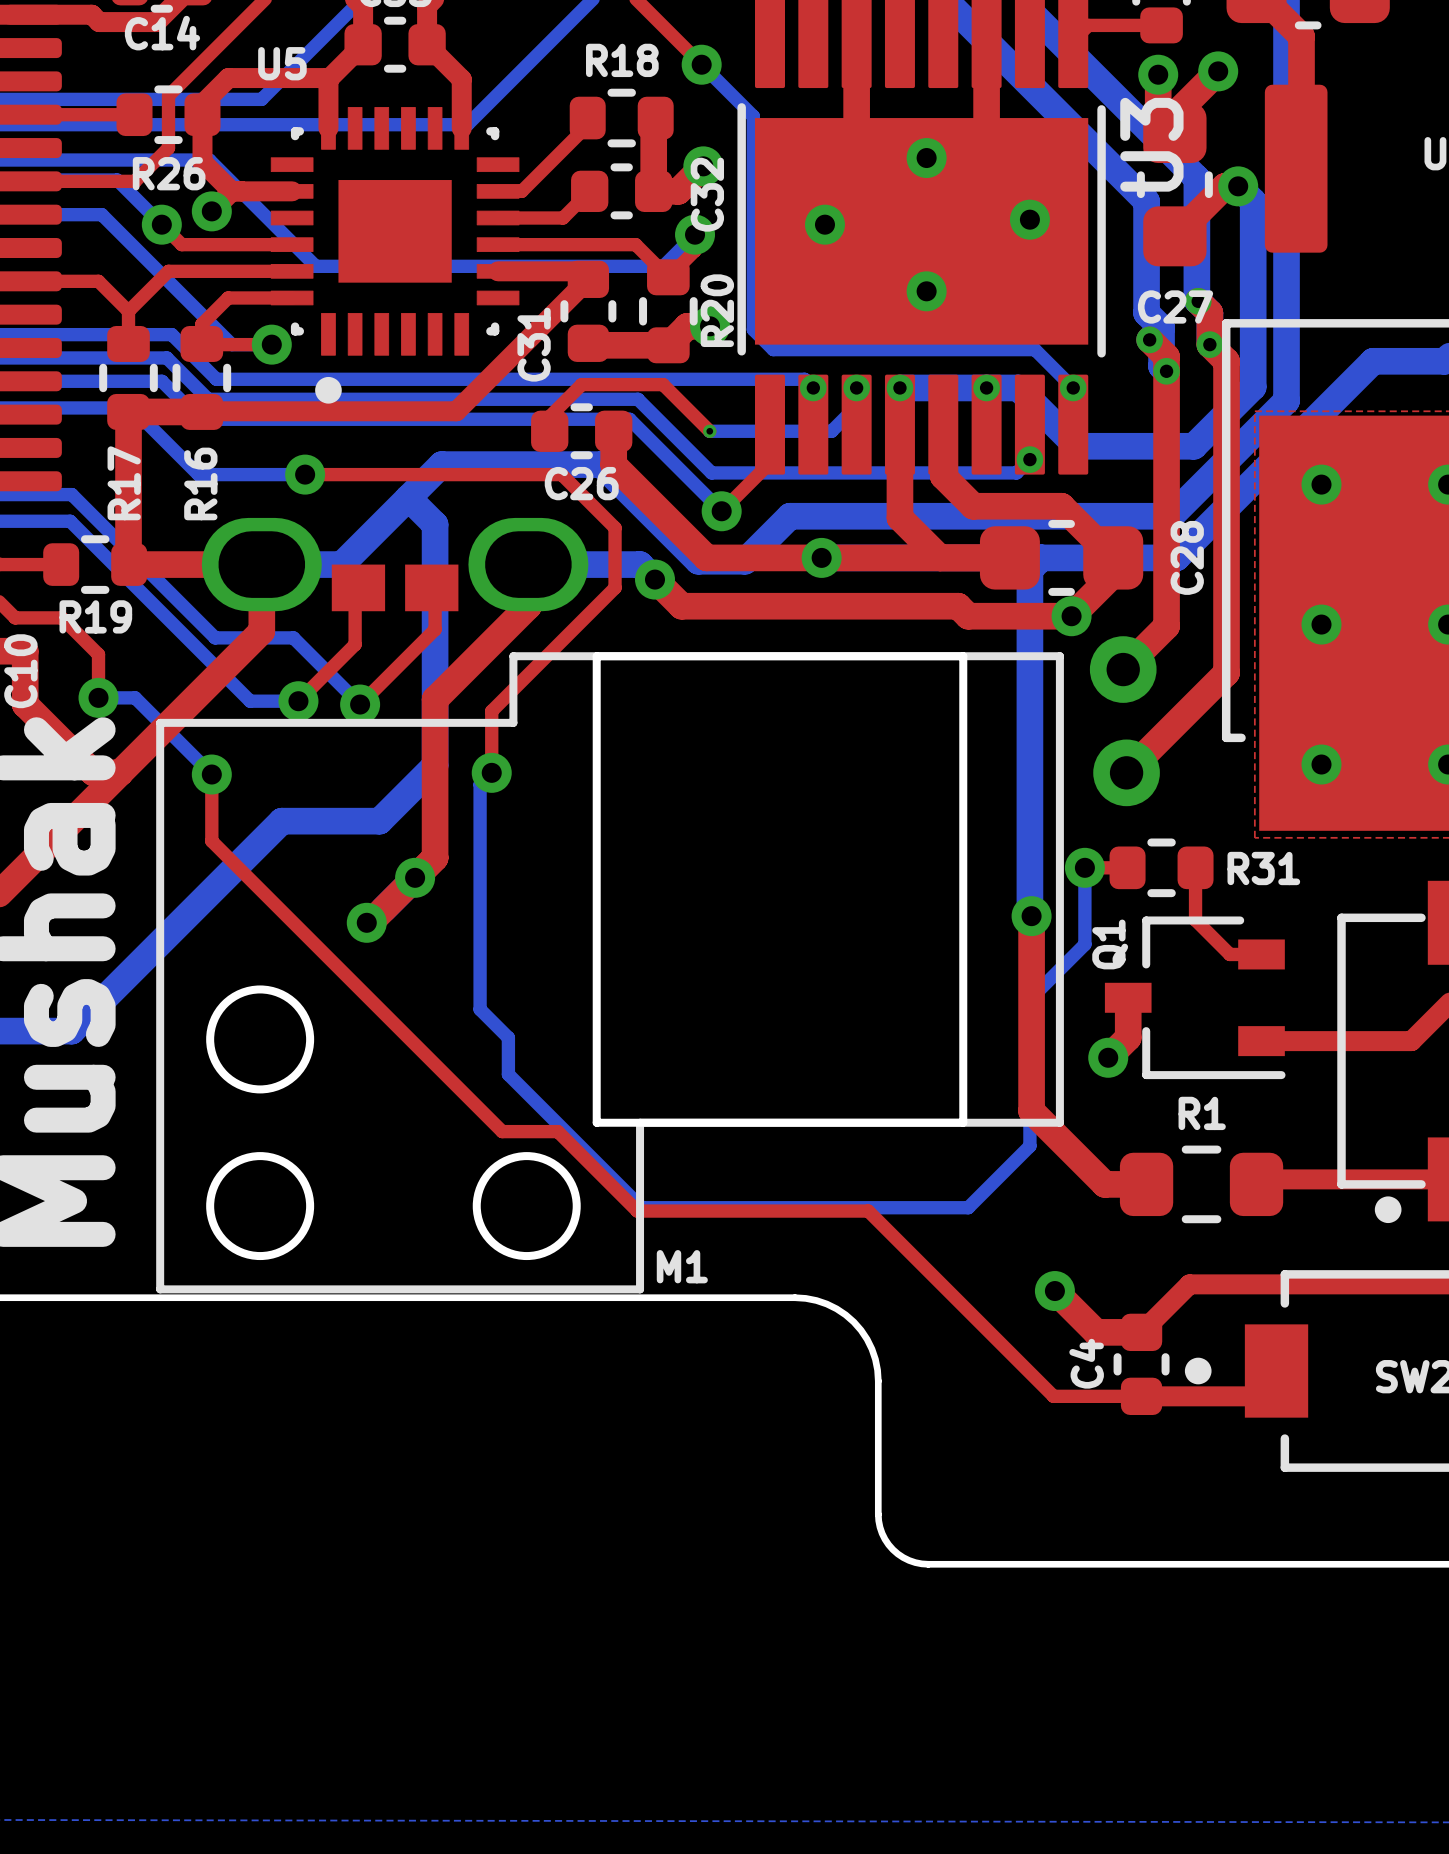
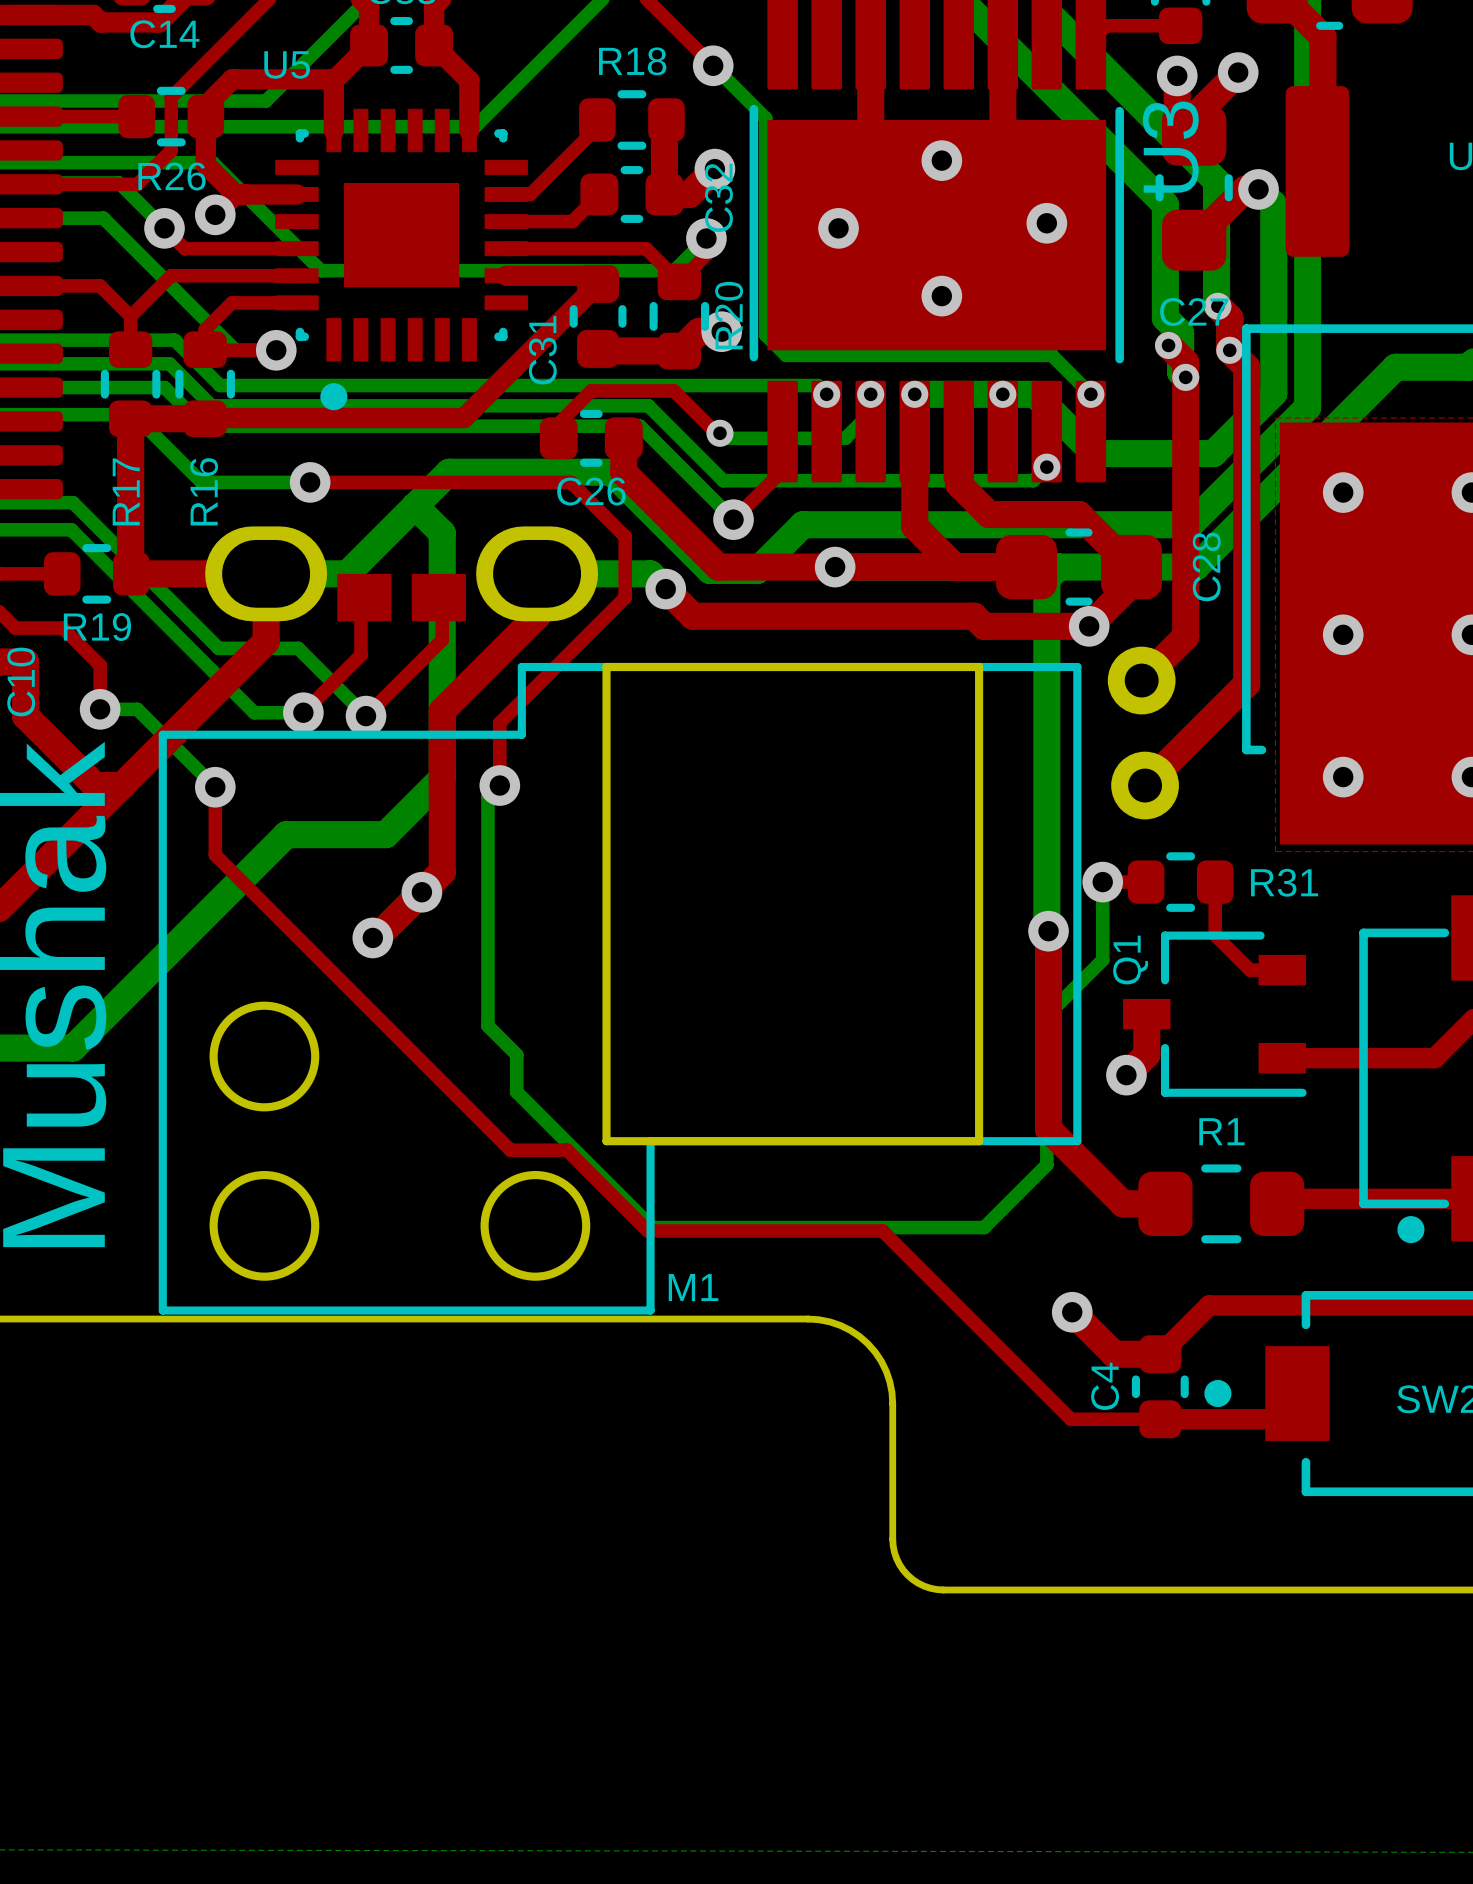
via size: [703, 424, 717, 438] -> [706, 419, 734, 447]

